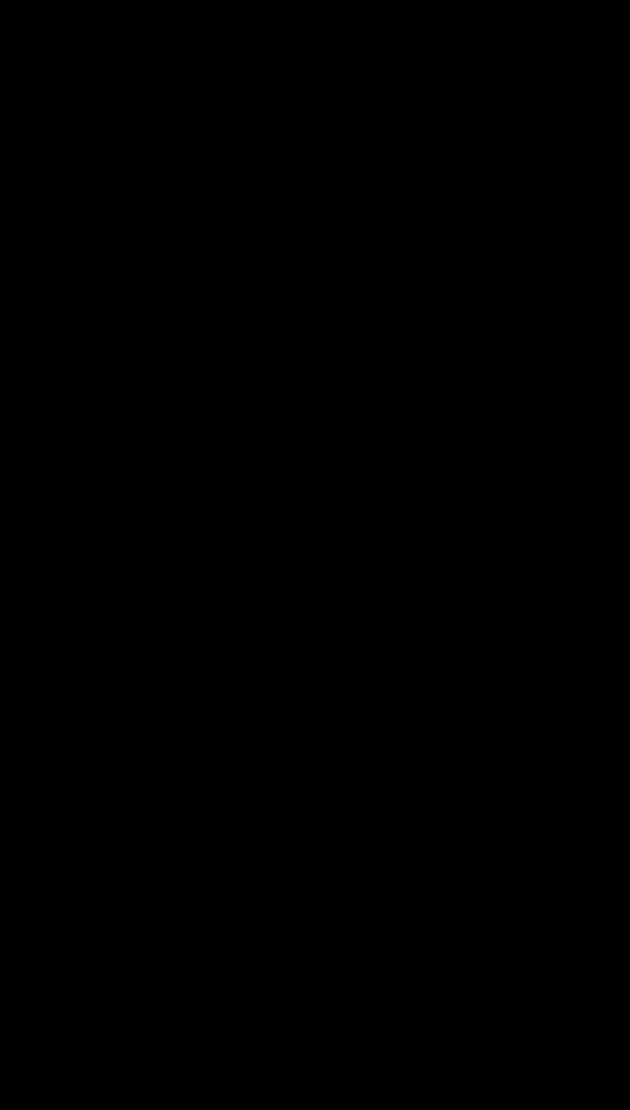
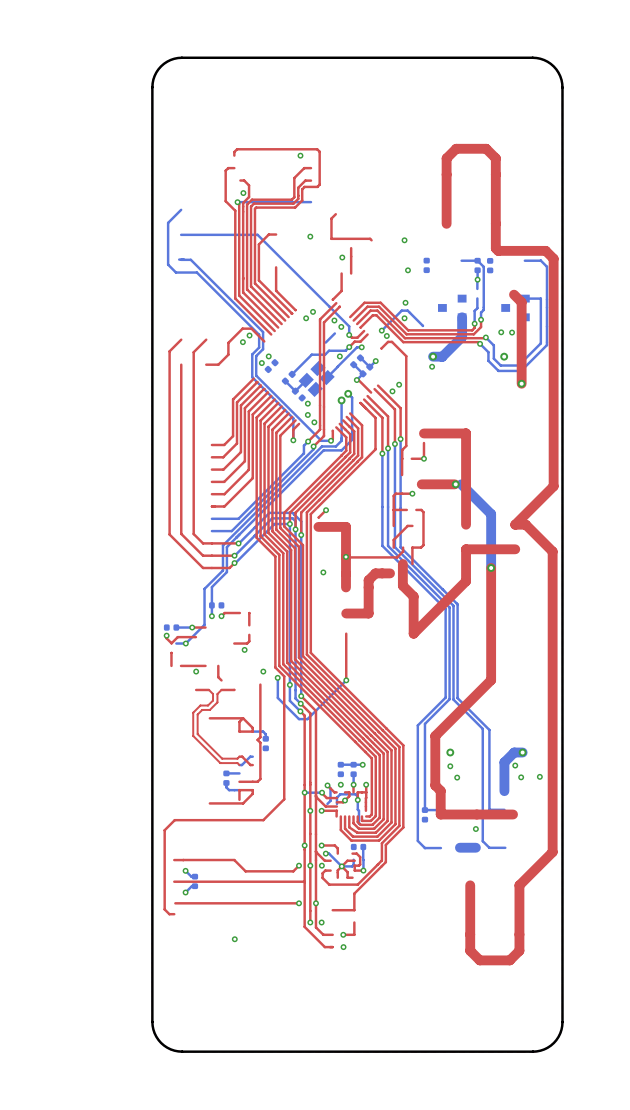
board edge: none -> (181, 57) (532, 57) (544, 60) (550, 63) (560, 76) (562, 87) (562, 1022) (560, 1033) (556, 1040) (544, 1049) (532, 1051) (182, 1051) (174, 1050) (164, 1045) (154, 1033) (152, 1021) (152, 87) (154, 75) (161, 66) (170, 60) (181, 57)
top track: none -> (234, 155) (237, 149) (317, 149) (319, 151) (319, 184) (317, 186) (304, 186) (302, 189) (302, 200) (295, 207) (254, 208) (254, 283) (288, 317)
via: none -> (300, 155)
top track: none -> (234, 168) (228, 168) (225, 170) (225, 201) (235, 210) (235, 298) (271, 334)
top track: none -> (311, 168) (304, 168) (294, 178) (294, 197) (291, 199) (252, 199) (247, 204) (247, 289) (281, 324)
top track: none -> (240, 180) (244, 180) (249, 185) (249, 197) (243, 203) (243, 292) (278, 327)
top track: none -> (311, 180) (305, 180) (298, 187) (298, 198) (293, 203) (253, 203) (251, 206) (251, 286) (285, 320)
via: none -> (243, 193)
top track: none -> (237, 202) (239, 203) (239, 295) (274, 331)
bottom track: none -> (237, 202) (311, 202)
via: none -> (237, 202)
bottom track: none -> (181, 209) (168, 222) (168, 264) (175, 272) (196, 272) (259, 334) (259, 347) (252, 354) (252, 377) (293, 418) (293, 440)
top track: none -> (335, 214) (331, 218) (331, 238) (371, 240)
top track: none -> (446, 223) (446, 158) (456, 148) (486, 148) (495, 158) (495, 248) (498, 250) (545, 250) (553, 258) (553, 486) (515, 524) (525, 524) (552, 551) (552, 852) (519, 885) (519, 950) (509, 960) (479, 960) (470, 950) (470, 885)
bottom track: none -> (181, 234) (257, 234) (349, 326) (349, 335)
top track: none -> (276, 234) (268, 234) (258, 244) (258, 280) (291, 313)
via: none -> (310, 236)
via: none -> (404, 240)
top track: none -> (351, 248) (351, 273)
via: none -> (342, 257)
bottom track: none -> (179, 259) (183, 259)
bottom track: none -> (181, 259) (190, 259) (263, 332) (263, 349) (256, 356) (256, 375) (321, 440) (330, 440)
bottom track: none -> (461, 260) (477, 260) (483, 266) (483, 309) (481, 312) (481, 319)
bottom track: none -> (524, 260) (540, 260)
bottom track: none -> (540, 260) (546, 266) (546, 345) (521, 370) (498, 370) (488, 360) (488, 352) (480, 343)
part: none -> (426, 265)
part: none -> (477, 265)
part: none -> (490, 265)
top track: none -> (276, 267) (276, 290) (295, 310)
via: none -> (407, 270)
bottom track: none -> (477, 270) (477, 288)
top track: none -> (341, 273) (341, 290) (332, 299)
via: none -> (477, 279)
top track: none -> (514, 294) (521, 302) (521, 383)
bottom track: none -> (477, 298) (474, 323)
bottom track: none -> (525, 298) (540, 298) (540, 343) (518, 365) (500, 365) (493, 358) (493, 345) (485, 337)
via: none -> (405, 302)
top track: none -> (336, 303) (320, 319) (320, 429) (308, 441)
top track: none -> (339, 306) (323, 322) (323, 436) (313, 446)
part: none -> (452, 307)
part: none -> (515, 307)
via: none -> (313, 311)
top track: none -> (350, 317) (364, 302) (380, 302) (408, 330) (472, 330) (474, 323)
bottom track: none -> (462, 317) (462, 336) (442, 356) (433, 356)
via: none -> (306, 318)
via: none -> (404, 318)
top track: none -> (481, 319) (481, 327) (473, 334) (406, 334) (379, 306) (367, 306) (353, 320)
via: none -> (481, 319)
via: none -> (334, 320)
via: none -> (474, 323)
top track: none -> (357, 324) (370, 310) (377, 310) (404, 338) (485, 337)
bottom track: none -> (422, 325) (407, 310) (401, 310) (381, 330)
via: none -> (341, 326)
top track: none -> (360, 327) (372, 315) (376, 315) (403, 342) (478, 342) (480, 343)
via: none -> (381, 330)
top track: none -> (364, 331) (357, 337) (351, 337) (349, 335)
via: none -> (501, 332)
via: none -> (512, 332)
bottom track: none -> (334, 333) (325, 342)
top track: none -> (367, 334) (360, 341) (354, 341) (349, 347)
via: none -> (249, 335)
via: none -> (349, 335)
via: none -> (386, 336)
via: none -> (485, 337)
top track: none -> (181, 339) (169, 351) (169, 534) (203, 567) (229, 567) (234, 563)
top track: none -> (206, 339) (193, 352) (193, 534) (203, 543) (238, 543)
top track: none -> (264, 341) (251, 328) (242, 328) (228, 342) (228, 354) (218, 364) (206, 364)
via: none -> (242, 342)
via: none -> (480, 343)
bottom track: none -> (349, 347) (345, 350) (329, 350) (325, 354) (311, 354) (292, 374)
via: none -> (349, 347)
bottom track: none -> (361, 347) (357, 347) (327, 377)
via: none -> (361, 347)
top track: none -> (381, 348) (388, 341) (391, 341) (406, 356) (406, 445) (402, 450) (402, 475)
via: none -> (268, 356)
via: none -> (339, 356)
via: none -> (433, 356)
via: none -> (504, 356)
bottom track: none -> (360, 357) (369, 367) (375, 361)
part: none -> (357, 361)
via: none -> (375, 361)
via: none -> (261, 363)
top track: none -> (181, 364) (181, 533) (203, 555) (234, 555)
bottom track: none -> (353, 364) (363, 373) (356, 380)
part: none -> (271, 366)
via: none -> (432, 366)
part: none -> (366, 370)
part: none -> (288, 377)
top track: none -> (253, 378) (233, 399) (233, 436) (224, 444) (211, 444)
part: none -> (316, 378)
bottom track: none -> (306, 380) (295, 391) (285, 381)
top track: none -> (356, 380) (371, 392)
via: none -> (356, 380)
top track: none -> (256, 382) (237, 402) (237, 443) (223, 457) (211, 457)
via: none -> (521, 383)
via: none -> (399, 384)
top track: none -> (378, 385) (400, 408) (400, 439)
top track: none -> (260, 386) (240, 405) (240, 452) (223, 469) (211, 469)
top track: none -> (264, 389) (244, 408) (244, 461) (224, 481) (211, 481)
top track: none -> (374, 389) (394, 409) (394, 443)
via: none -> (392, 391)
top track: none -> (267, 392) (248, 411) (248, 469) (224, 494) (211, 494)
bottom track: none -> (348, 393) (352, 397) (352, 439) (341, 450) (323, 450) (226, 547) (226, 572) (211, 587) (211, 616)
via: none -> (348, 393)
part: none -> (298, 394)
top track: none -> (271, 396) (252, 414) (252, 478) (224, 506) (211, 506)
top track: none -> (367, 396) (388, 416) (388, 448)
top track: none -> (274, 399) (256, 417) (256, 537) (275, 556) (275, 667) (284, 676) (284, 799) (263, 820) (174, 820) (164, 830) (164, 909) (169, 914) (174, 914)
top track: none -> (364, 399) (382, 417) (382, 453)
bottom track: none -> (341, 400) (341, 440) (335, 446) (321, 446) (222, 545) (222, 570) (204, 588) (204, 624) (185, 643) (176, 643)
via: none -> (341, 400)
top track: none -> (278, 403) (260, 420) (260, 536) (279, 554) (279, 665) (371, 758) (371, 814) (366, 816)
via: none -> (307, 403)
top track: none -> (360, 403) (375, 417) (375, 449) (310, 514) (310, 652) (403, 745) (403, 827) (385, 844) (385, 862) (354, 893) (354, 910) (332, 910)
top track: none -> (281, 406) (264, 423) (264, 534) (283, 553) (283, 664) (375, 756) (375, 816) (370, 820) (362, 820) (361, 816)
top track: none -> (285, 409) (268, 426) (268, 532) (287, 551) (287, 662) (379, 755) (379, 817) (372, 824) (360, 824) (357, 821) (357, 816)
top track: none -> (288, 413) (272, 429) (272, 531) (291, 550) (291, 661) (383, 753) (383, 819) (374, 828) (358, 828) (353, 823) (353, 816)
top track: none -> (350, 413) (362, 425) (362, 457) (357, 461)
via: none -> (307, 414)
top track: none -> (292, 416) (276, 432) (276, 529) (295, 548) (295, 659) (387, 751) (387, 820) (375, 832) (357, 832) (349, 827) (349, 816)
top track: none -> (346, 416) (358, 428) (358, 455) (301, 512) (301, 535)
top track: none -> (295, 420) (280, 435) (280, 528) (299, 546) (299, 657) (391, 750) (391, 822) (377, 836) (353, 836) (345, 828) (345, 816)
top track: none -> (343, 420) (354, 431) (354, 453) (349, 458)
via: none -> (314, 422)
top track: none -> (299, 423) (293, 429) (293, 440)
top track: none -> (339, 423) (350, 434) (350, 452) (345, 456)
top track: none -> (336, 427) (346, 437) (346, 450) (341, 455)
top track: none -> (332, 430) (330, 440)
top track: none -> (423, 433) (466, 433)
top track: none -> (466, 433) (466, 524)
bottom track: none -> (400, 439) (400, 547) (457, 604) (457, 697) (489, 729) (489, 809) (504, 809)
via: none -> (400, 439)
via: none -> (293, 440)
via: none -> (330, 440)
bottom track: none -> (308, 441) (303, 445) (303, 453) (238, 518) (211, 518)
via: none -> (308, 441)
bottom track: none -> (394, 443) (394, 547) (453, 605) (453, 699) (482, 728) (482, 841) (489, 847) (505, 847)
via: none -> (394, 443)
top track: none -> (423, 443) (423, 458) (411, 458)
bottom track: none -> (313, 446) (313, 449) (231, 531) (211, 531)
via: none -> (313, 446)
bottom track: none -> (388, 448) (388, 545) (449, 607) (449, 699) (424, 723) (424, 810) (440, 810)
via: none -> (388, 448)
bottom track: none -> (382, 453) (382, 545) (445, 609) (445, 697) (417, 725) (417, 840) (424, 848)
via: none -> (382, 453)
top track: none -> (341, 455) (284, 512) (284, 526) (302, 545) (302, 656) (395, 748) (395, 824) (379, 840) (351, 840) (340, 830) (340, 816)
top track: none -> (345, 457) (289, 512) (289, 524)
top track: none -> (349, 458) (295, 512) (295, 529)
via: none -> (423, 458)
top track: none -> (357, 461) (306, 512) (306, 654) (399, 747) (399, 825) (381, 843) (381, 860) (357, 884) (329, 884) (322, 877) (322, 873) (325, 870) (330, 870)
top track: none -> (421, 484) (454, 484)
via: none -> (455, 484)
bottom track: none -> (461, 484) (491, 514) (491, 567)
top track: none -> (412, 493) (395, 493) (393, 495) (393, 525)
via: none -> (412, 493)
top track: none -> (393, 509) (406, 509)
top track: none -> (416, 509) (423, 512) (423, 545) (421, 547) (412, 547) (412, 564)
top track: none -> (326, 510) (318, 517)
via: none -> (326, 510)
bottom track: none -> (294, 514) (269, 512) (238, 543)
bottom track: none -> (294, 514) (301, 521) (301, 696)
via: none -> (289, 524)
top track: none -> (412, 525) (407, 525) (393, 539) (393, 547)
top track: none -> (318, 526) (345, 526) (345, 587)
via: none -> (295, 529)
via: none -> (301, 535)
via: none -> (238, 543)
top track: none -> (403, 547) (403, 551) (397, 557) (345, 556)
top track: none -> (515, 549) (466, 549) (466, 581) (413, 633) (413, 596) (402, 585) (402, 564)
bottom track: none -> (234, 555) (272, 518) (292, 518) (295, 521) (295, 698) (300, 703)
via: none -> (234, 555)
via: none -> (345, 556)
bottom track: none -> (234, 563) (274, 524) (289, 524) (289, 700) (300, 711)
via: none -> (234, 563)
top track: none -> (491, 567) (491, 680) (435, 736) (435, 785) (440, 790) (440, 814) (513, 814)
via: none -> (491, 567)
via: none -> (323, 572)
top track: none -> (390, 573) (375, 573) (368, 580) (368, 613) (346, 613)
part: none -> (216, 605)
top track: none -> (239, 613) (224, 613) (221, 616)
top track: none -> (249, 613) (249, 625)
via: none -> (211, 616)
via: none -> (221, 616)
part: none -> (171, 627)
bottom track: none -> (176, 627) (192, 627)
top track: none -> (192, 627) (205, 627)
via: none -> (192, 627)
top track: none -> (346, 633) (346, 680)
top track: none -> (249, 634) (249, 641) (247, 643) (234, 643)
top track: none -> (166, 635) (171, 643) (177, 637) (195, 637)
via: none -> (166, 635)
via: none -> (185, 643)
via: none -> (244, 649)
top track: none -> (171, 652) (171, 665)
top track: none -> (181, 665) (205, 665)
top track: none -> (218, 665) (218, 677) (221, 680)
via: none -> (196, 671)
via: none -> (263, 671)
bottom track: none -> (277, 677) (277, 697) (299, 719) (307, 719) (346, 680)
via: none -> (277, 677)
via: none -> (346, 680)
top track: none -> (260, 684) (260, 737) (257, 739) (260, 742) (260, 779) (257, 781) (239, 781)
via: none -> (289, 684)
top track: none -> (196, 689) (208, 689) (213, 694) (213, 700) (208, 705) (200, 705) (193, 712) (193, 735) (220, 763) (237, 763) (239, 765)
top track: none -> (234, 689) (221, 689) (217, 694) (217, 702) (209, 709) (202, 709) (197, 714) (197, 734) (222, 758) (237, 758) (242, 756) (252, 765)
top track: none -> (301, 696) (315, 710) (315, 927) (323, 934) (332, 934)
via: none -> (301, 696)
top track: none -> (300, 703) (310, 713) (310, 922)
via: none -> (300, 703)
top track: none -> (300, 711) (304, 715) (304, 926) (324, 947) (332, 947)
via: none -> (300, 711)
top track: none -> (209, 718) (243, 718)
top track: none -> (243, 718) (239, 721) (239, 731) (252, 731) (252, 727) (243, 718)
bottom track: none -> (252, 731) (263, 731) (265, 734) (265, 738)
part: none -> (265, 743)
via: none -> (450, 752)
bottom track: none -> (522, 752) (514, 752) (504, 762) (504, 791)
via: none -> (522, 752)
bottom track: none -> (252, 756) (239, 765)
bottom track: none -> (340, 764) (362, 764)
via: none -> (362, 764)
via: none -> (515, 765)
via: none -> (450, 766)
part: none -> (340, 769)
part: none -> (353, 769)
bottom track: none -> (226, 773) (239, 773)
bottom track: none -> (353, 774) (353, 784)
via: none -> (539, 776)
via: none -> (457, 777)
via: none -> (521, 777)
part: none -> (226, 778)
bottom track: none -> (226, 782) (226, 787) (229, 790) (239, 790)
via: none -> (340, 784)
top track: none -> (353, 784) (353, 792)
via: none -> (353, 784)
top track: none -> (366, 784) (365, 810)
via: none -> (366, 784)
top track: none -> (327, 785) (336, 792)
bottom track: none -> (327, 785) (330, 788) (330, 800) (327, 803)
via: none -> (327, 785)
bottom track: none -> (304, 792) (322, 792)
via: none -> (304, 792)
top track: none -> (322, 792) (326, 798) (336, 798)
via: none -> (322, 792)
top track: none -> (345, 792) (349, 792) (349, 796) (343, 802) (336, 802)
top track: none -> (366, 792) (357, 792) (357, 799)
top track: none -> (315, 796) (325, 806) (336, 806)
top track: none -> (239, 799) (239, 790) (252, 790) (252, 793) (243, 803) (209, 803)
via: none -> (357, 799)
via: none -> (345, 800)
bottom track: none -> (336, 803) (336, 797) (340, 794) (355, 794) (357, 796) (358, 823)
via: none -> (310, 810)
top track: none -> (321, 810) (336, 810) (336, 816)
via: none -> (321, 810)
part: none -> (424, 814)
via: none -> (475, 829)
via: none -> (304, 845)
top track: none -> (321, 845) (334, 845) (337, 848) (337, 853)
via: none -> (321, 845)
part: none -> (358, 846)
bottom track: none -> (363, 847) (363, 870)
bottom track: none -> (459, 847) (475, 847)
bottom track: none -> (424, 848) (440, 848)
top track: none -> (315, 851) (324, 860) (330, 860)
bottom track: none -> (325, 853) (329, 853) (341, 866) (352, 866) (353, 859)
via: none -> (325, 853)
top track: none -> (352, 853) (356, 853) (360, 857) (360, 864) (354, 865) (354, 870) (363, 870)
top track: none -> (174, 860) (234, 860) (245, 871) (293, 871) (299, 865)
top track: none -> (354, 860) (347, 860) (337, 870) (337, 877)
via: none -> (299, 865)
via: none -> (310, 865)
via: none -> (321, 865)
top track: none -> (341, 866) (347, 872) (347, 877) (352, 877)
via: none -> (341, 866)
bottom track: none -> (185, 870) (191, 876) (194, 876)
via: none -> (185, 870)
via: none -> (363, 870)
top track: none -> (174, 881) (304, 882)
part: none -> (194, 881)
bottom track: none -> (194, 886) (191, 886) (185, 892)
via: none -> (185, 892)
top track: none -> (175, 903) (299, 903)
via: none -> (299, 903)
via: none -> (315, 903)
via: none -> (310, 922)
via: none -> (321, 922)
top track: none -> (354, 922) (354, 934) (343, 934)
via: none -> (343, 934)
via: none -> (234, 939)
via: none -> (343, 947)

